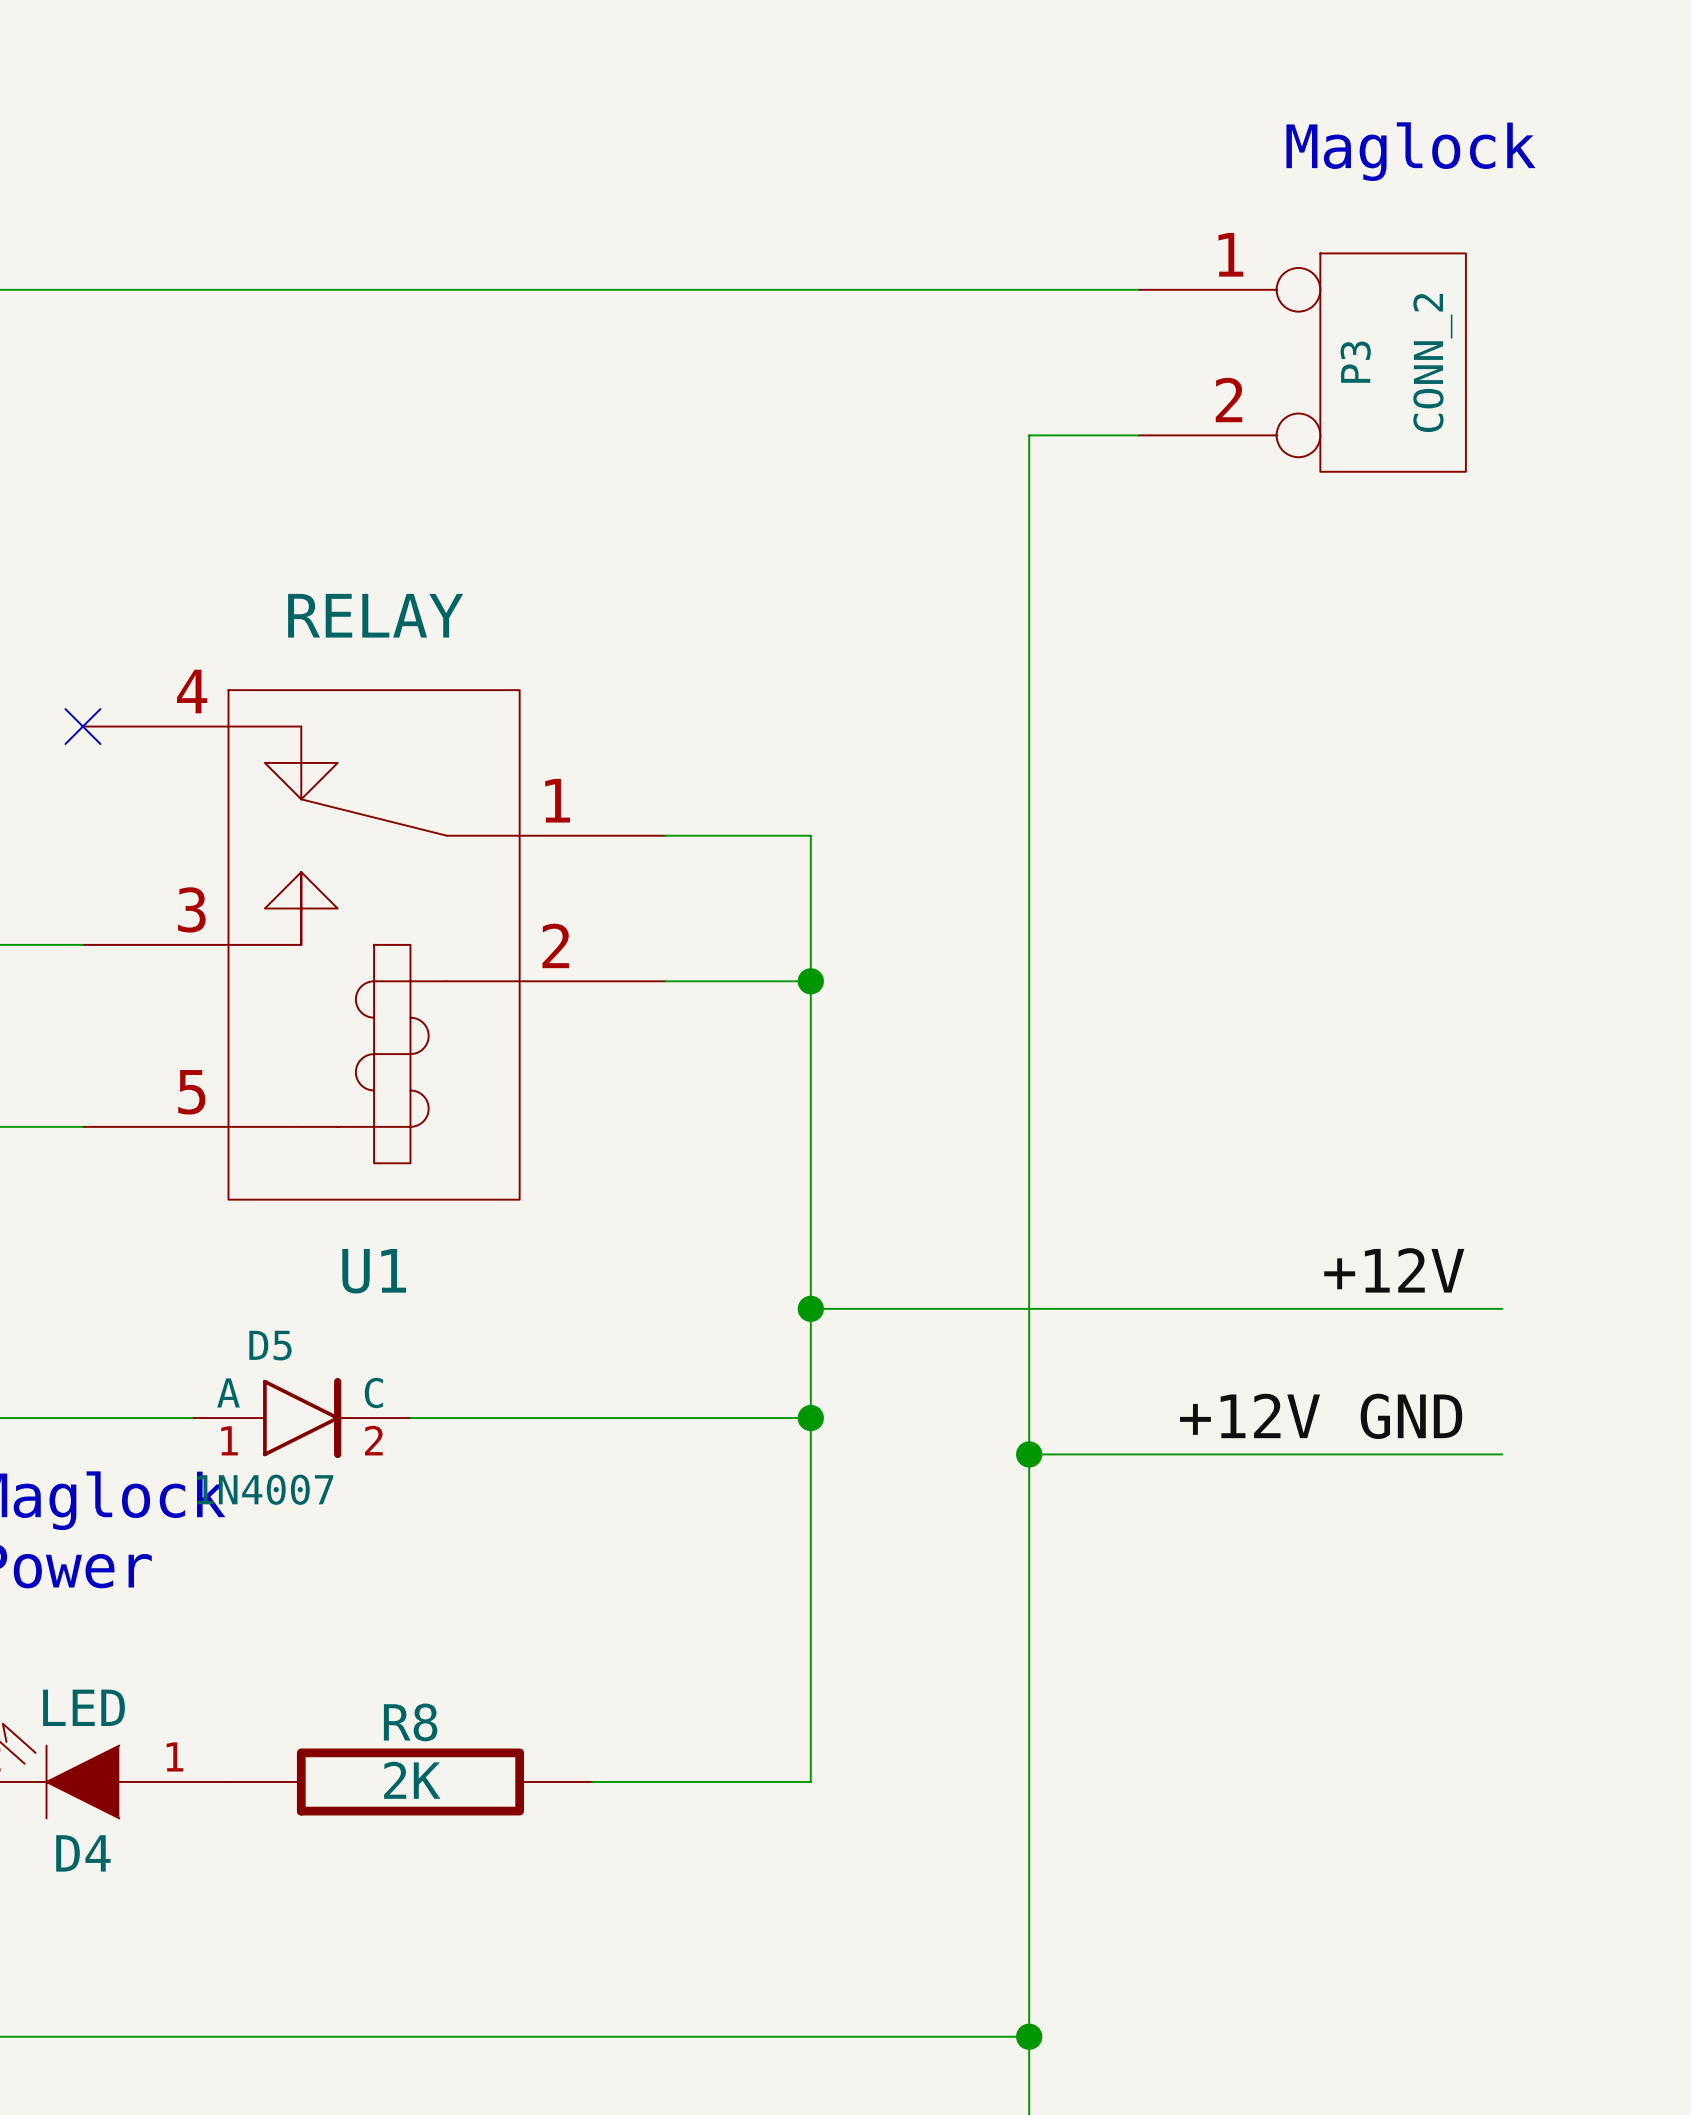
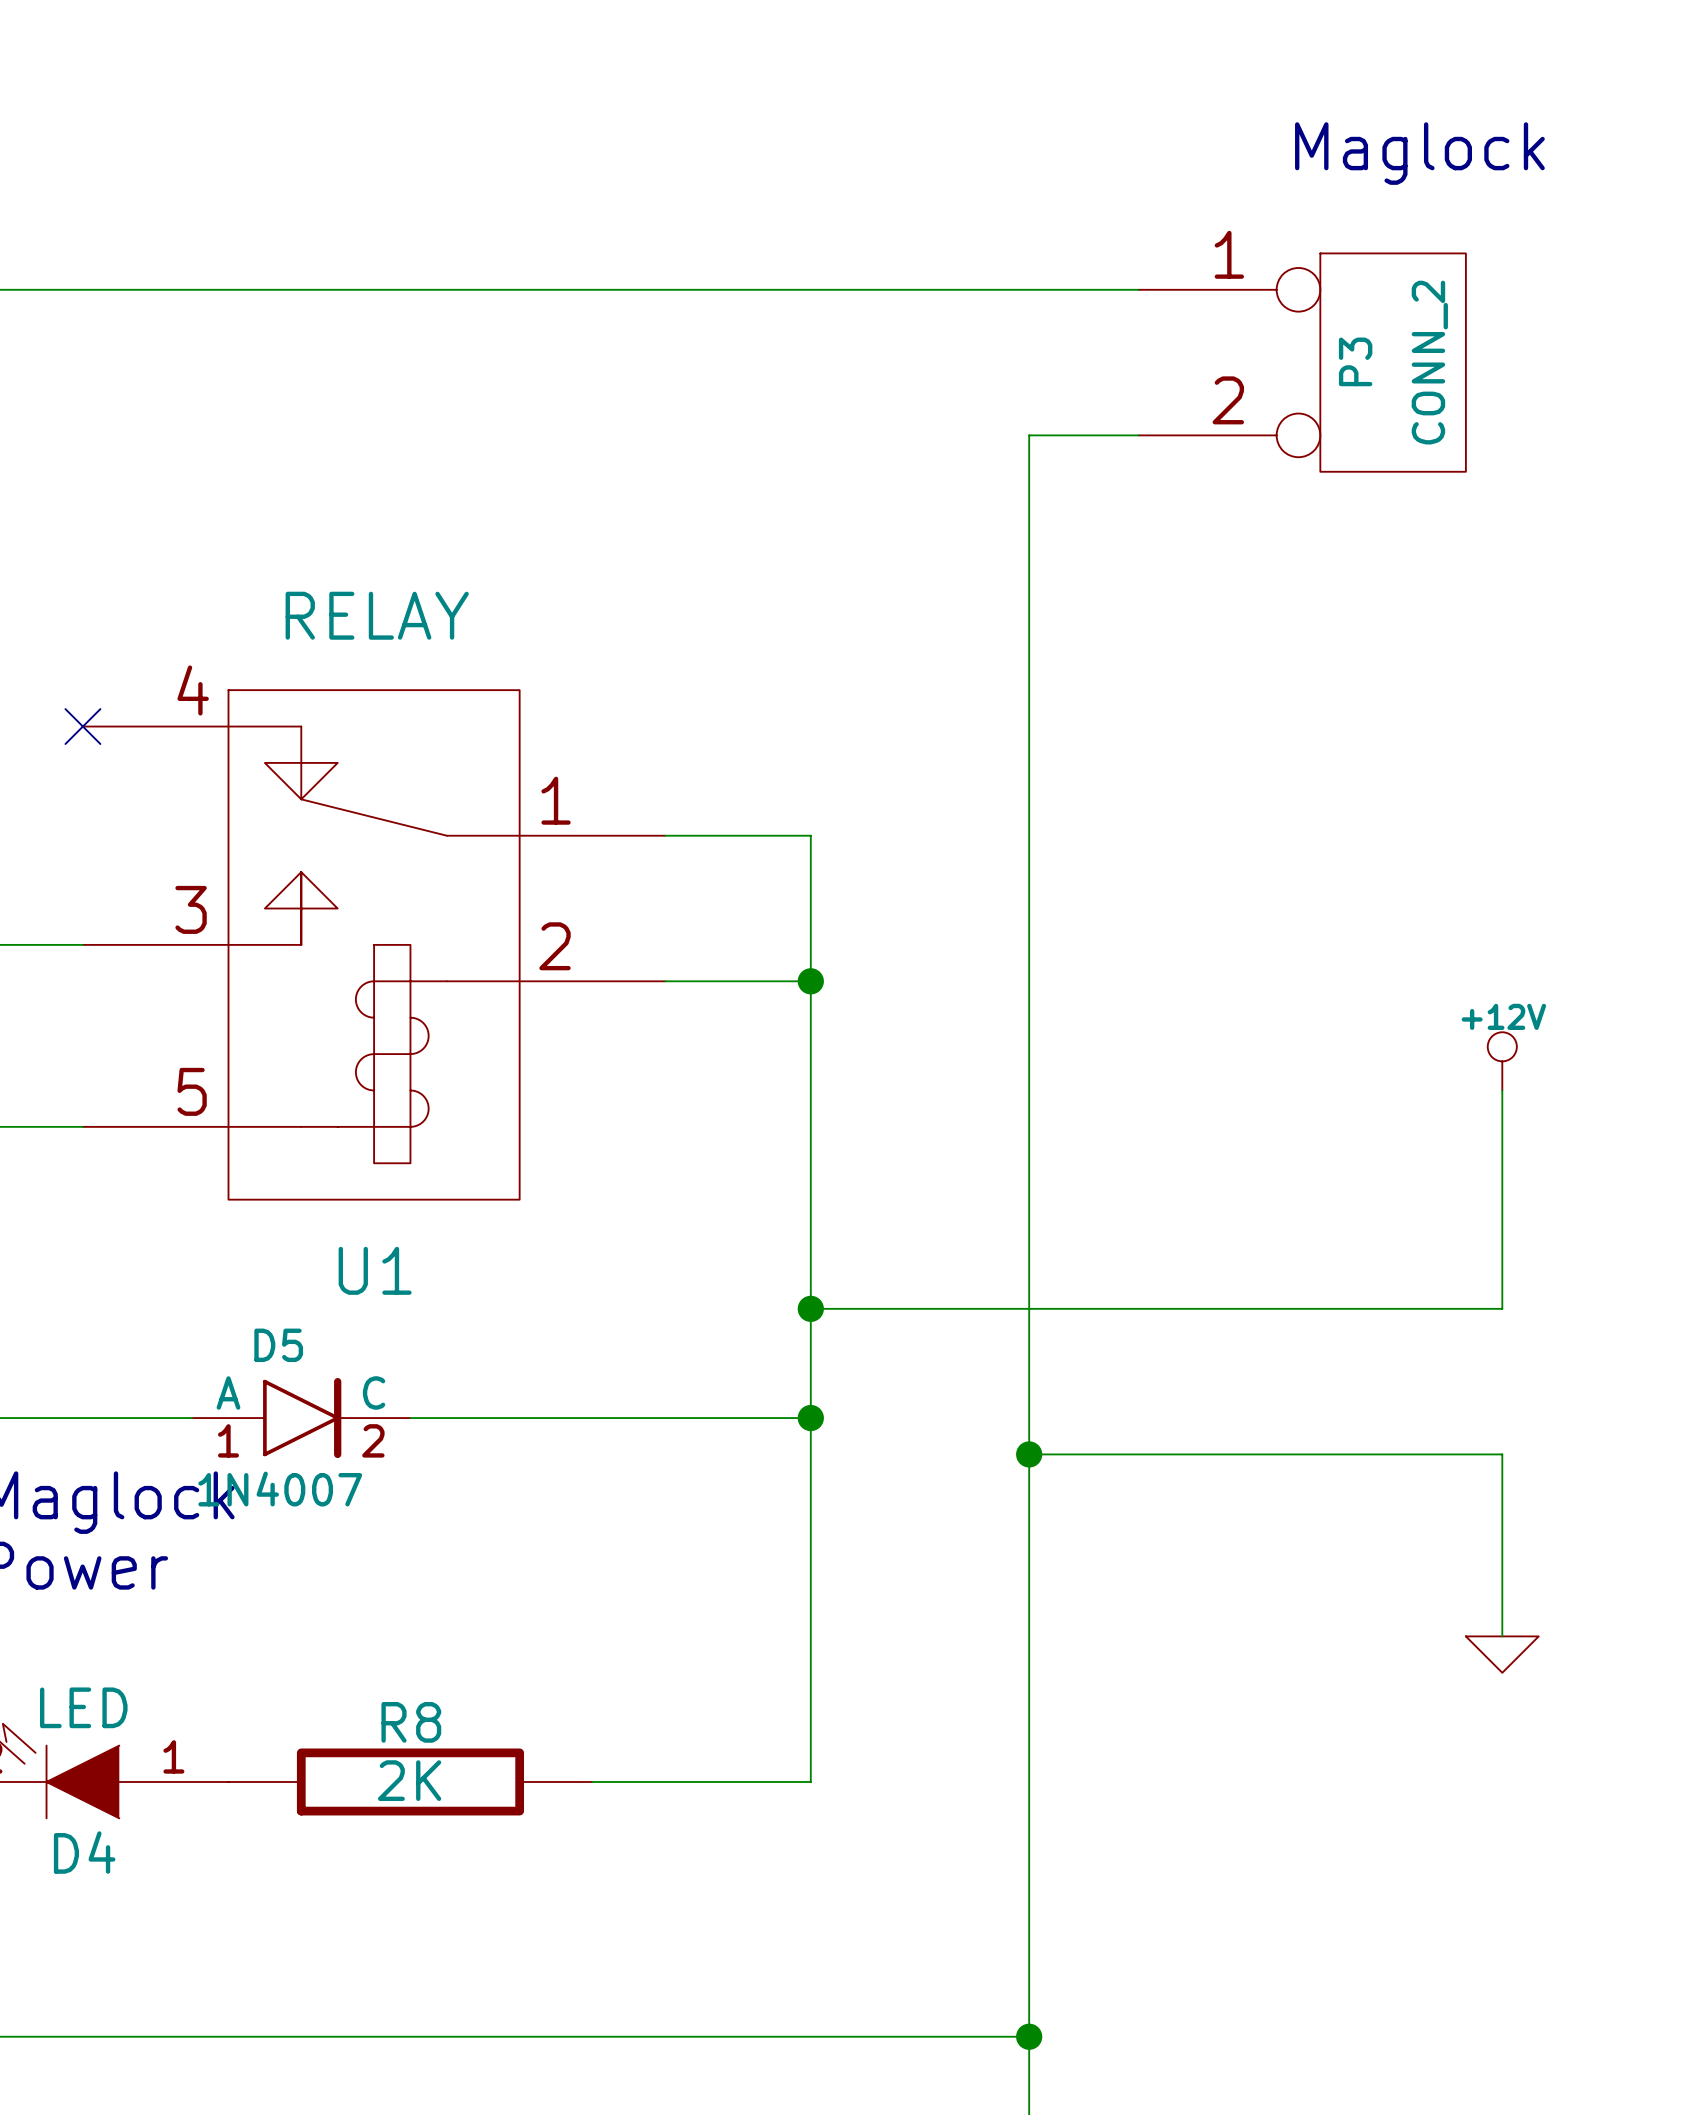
power symbol: none -> +12V (1502, 1061)
wire: none -> (1502, 1090) (1502, 1308)
label: +12V (1394, 1270) -> none
label: +12V GND (1321, 1416) -> none
wire: none -> (1502, 1454) (1502, 1636)
power symbol: none -> (1502, 1654)

